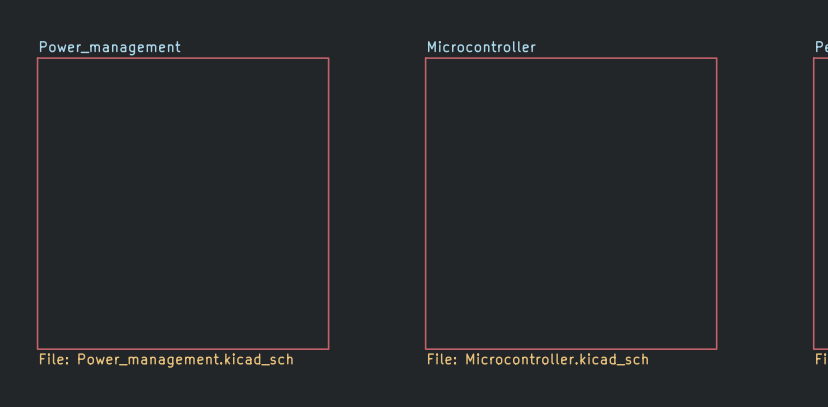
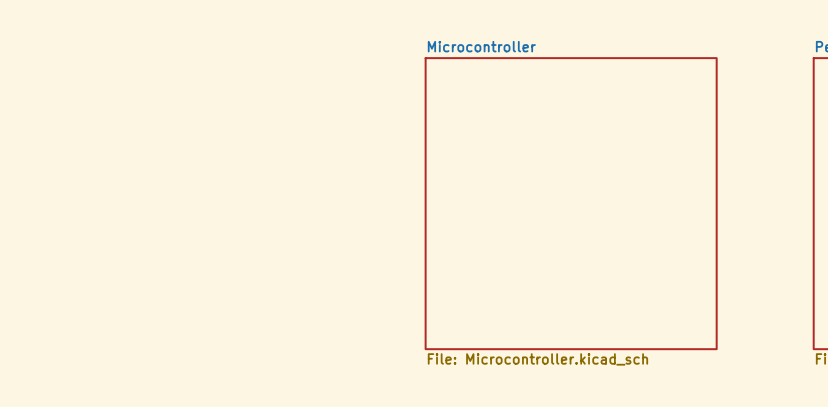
sheet Power_management: File: Power_management.kicad_sch (183, 203) -> none

